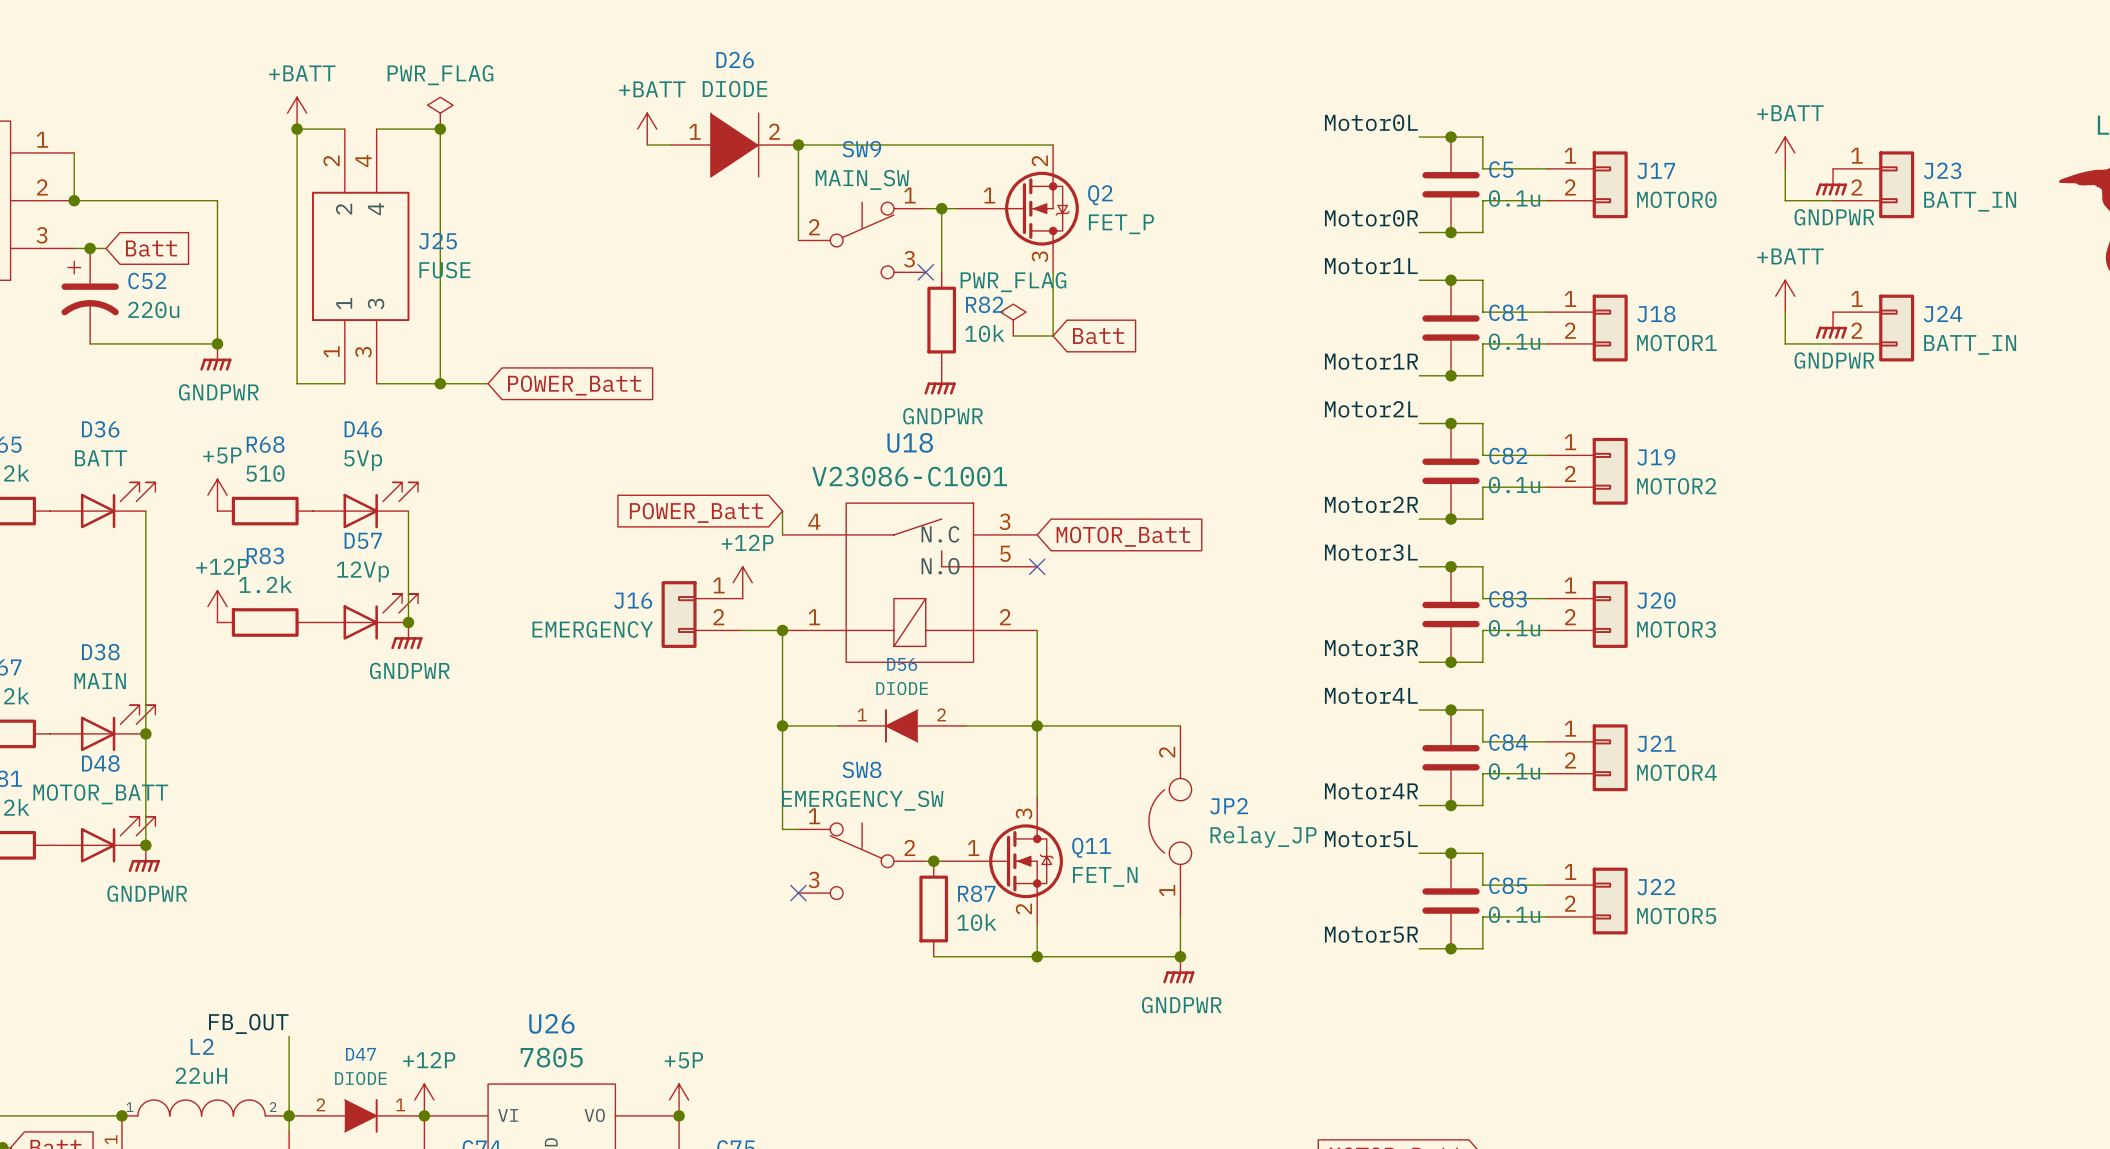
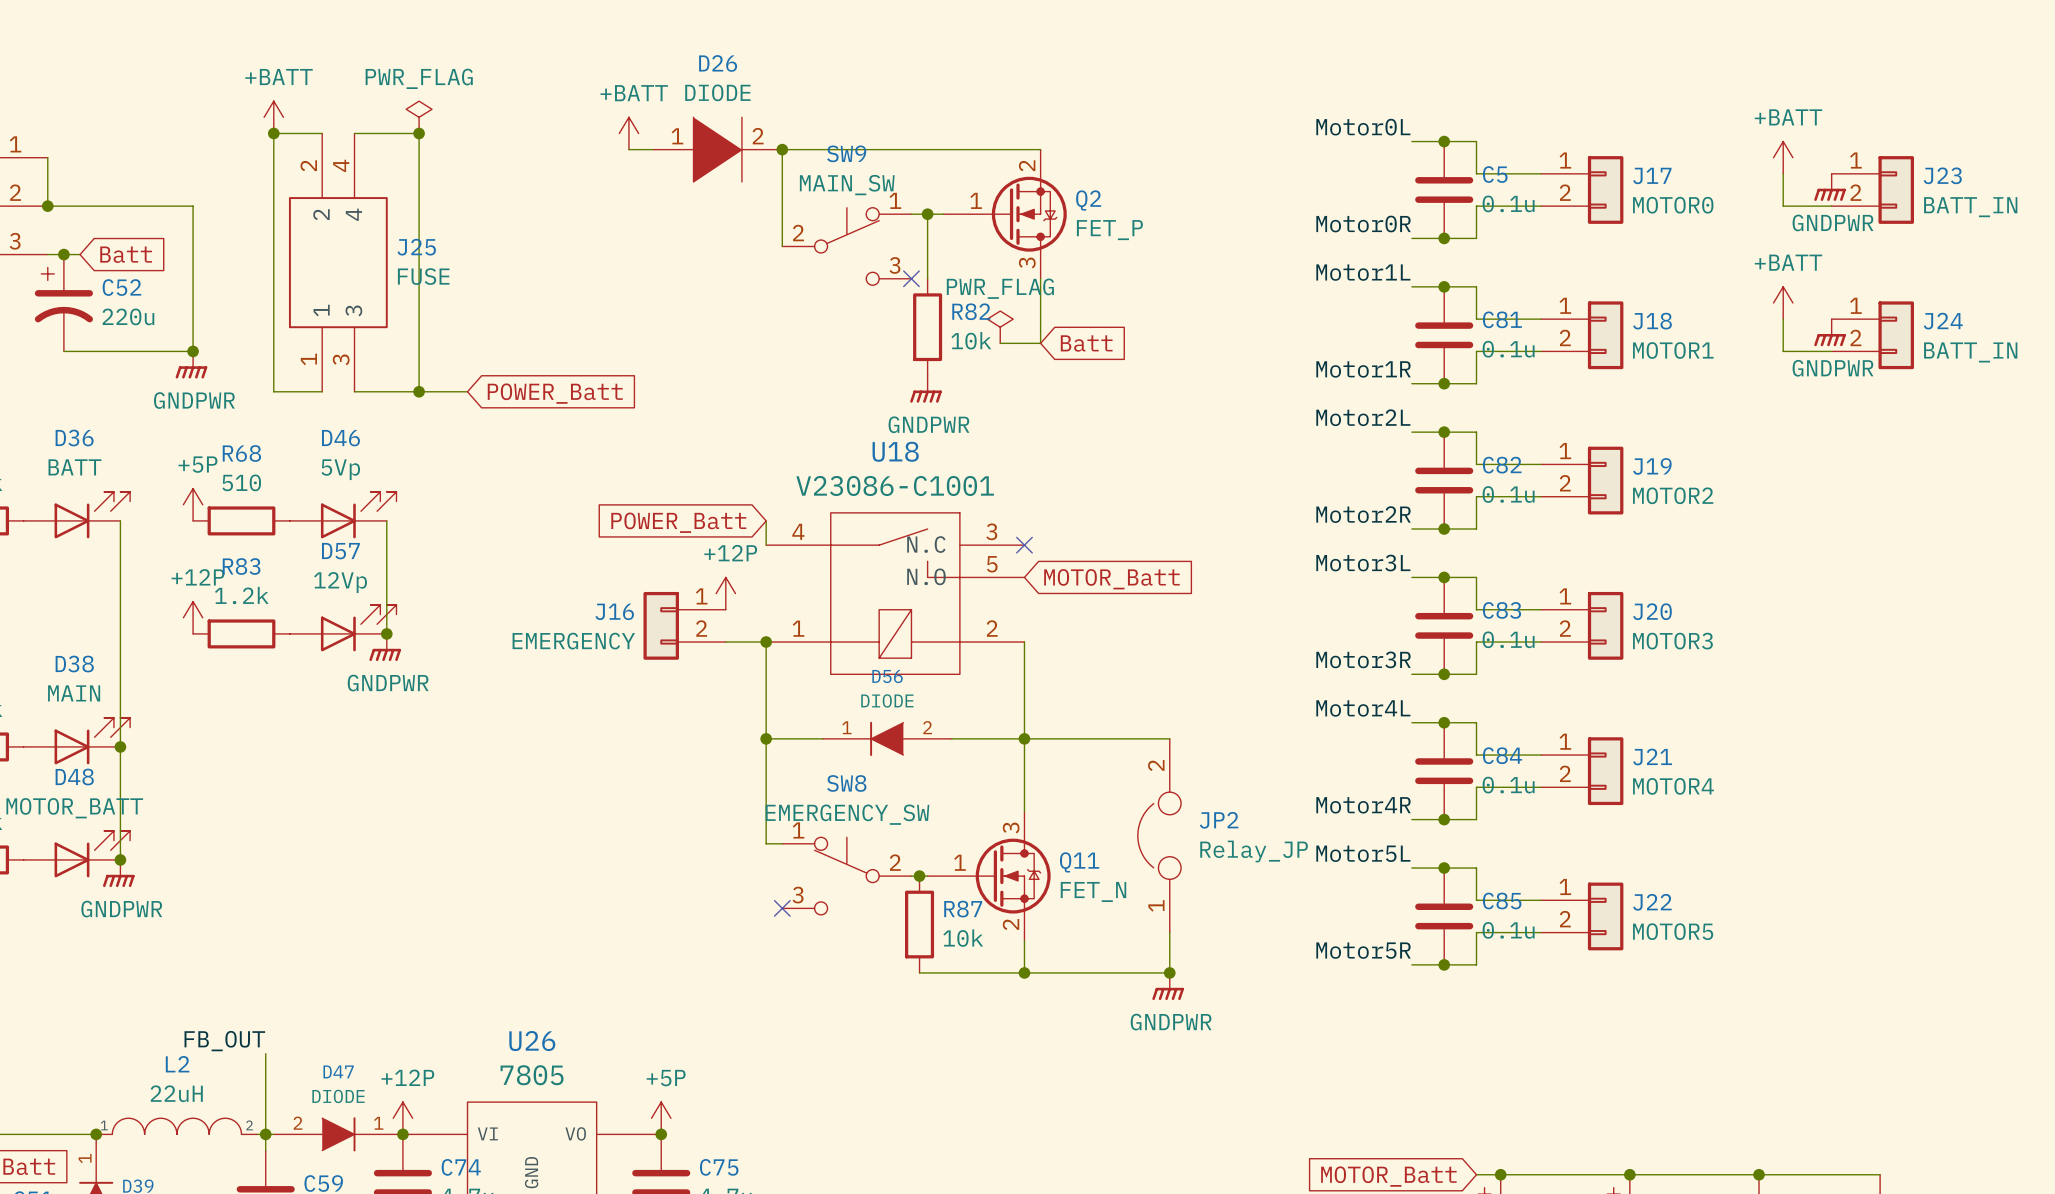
global label position: MOTOR_Batt (1123, 536) -> MOTOR_Batt (1111, 579)
no-connect mark position: (1037, 566) -> (1024, 545)

